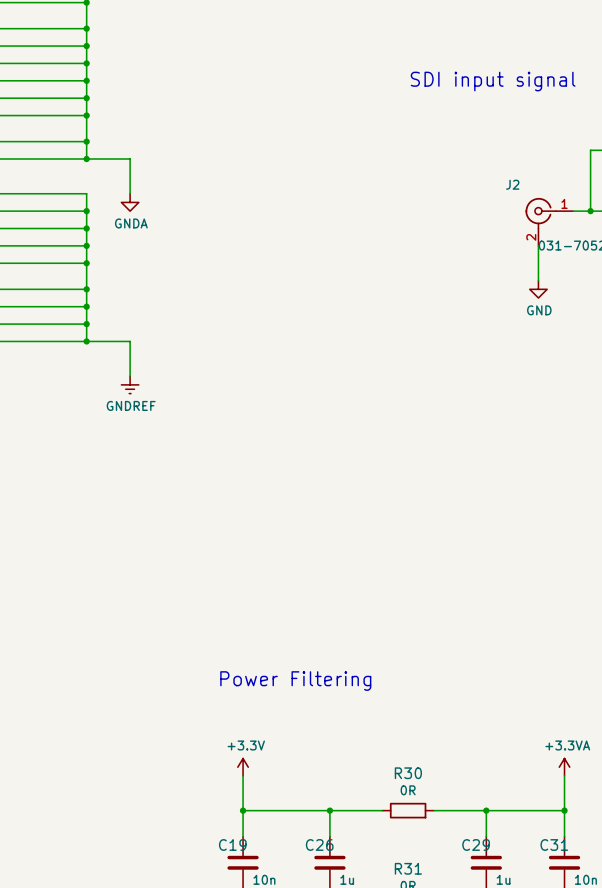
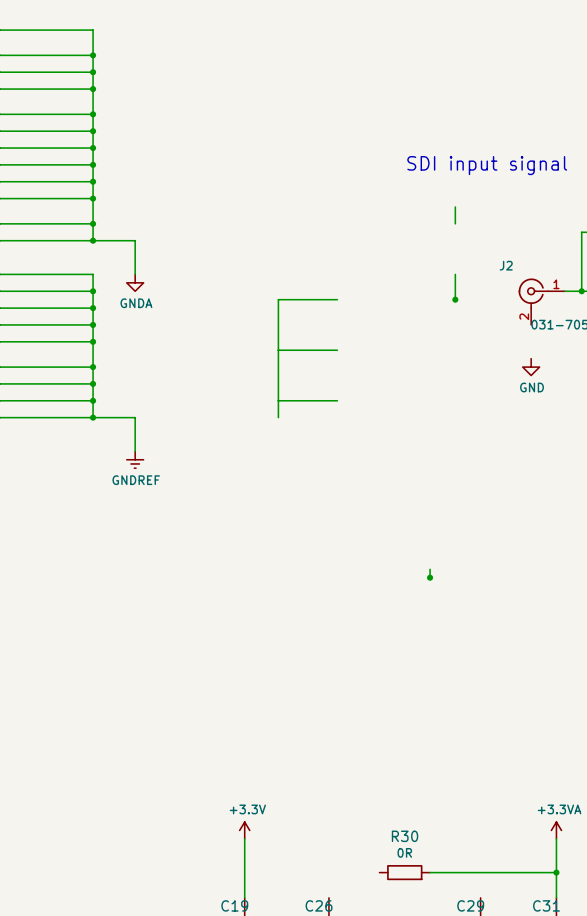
wire: none -> (455, 207) (455, 223)
wire: none -> (455, 274) (455, 299)
wire: none -> (337, 299) (278, 299) (278, 417)
junction: none -> (455, 299)
wire: (538, 245) (538, 280) -> none
wire: none -> (278, 350) (337, 350)
wire: none -> (278, 400) (337, 400)
wire: none -> (430, 569) (430, 577)
junction: none -> (430, 577)
text: Power Filtering (295, 681) -> none
wire: (243, 810) (382, 810) -> none
junction: (243, 810) -> none
wire: (329, 810) (329, 836) -> none
junction: (329, 810) -> none
wire: (486, 810) (486, 836) -> none
junction: (486, 810) -> none

